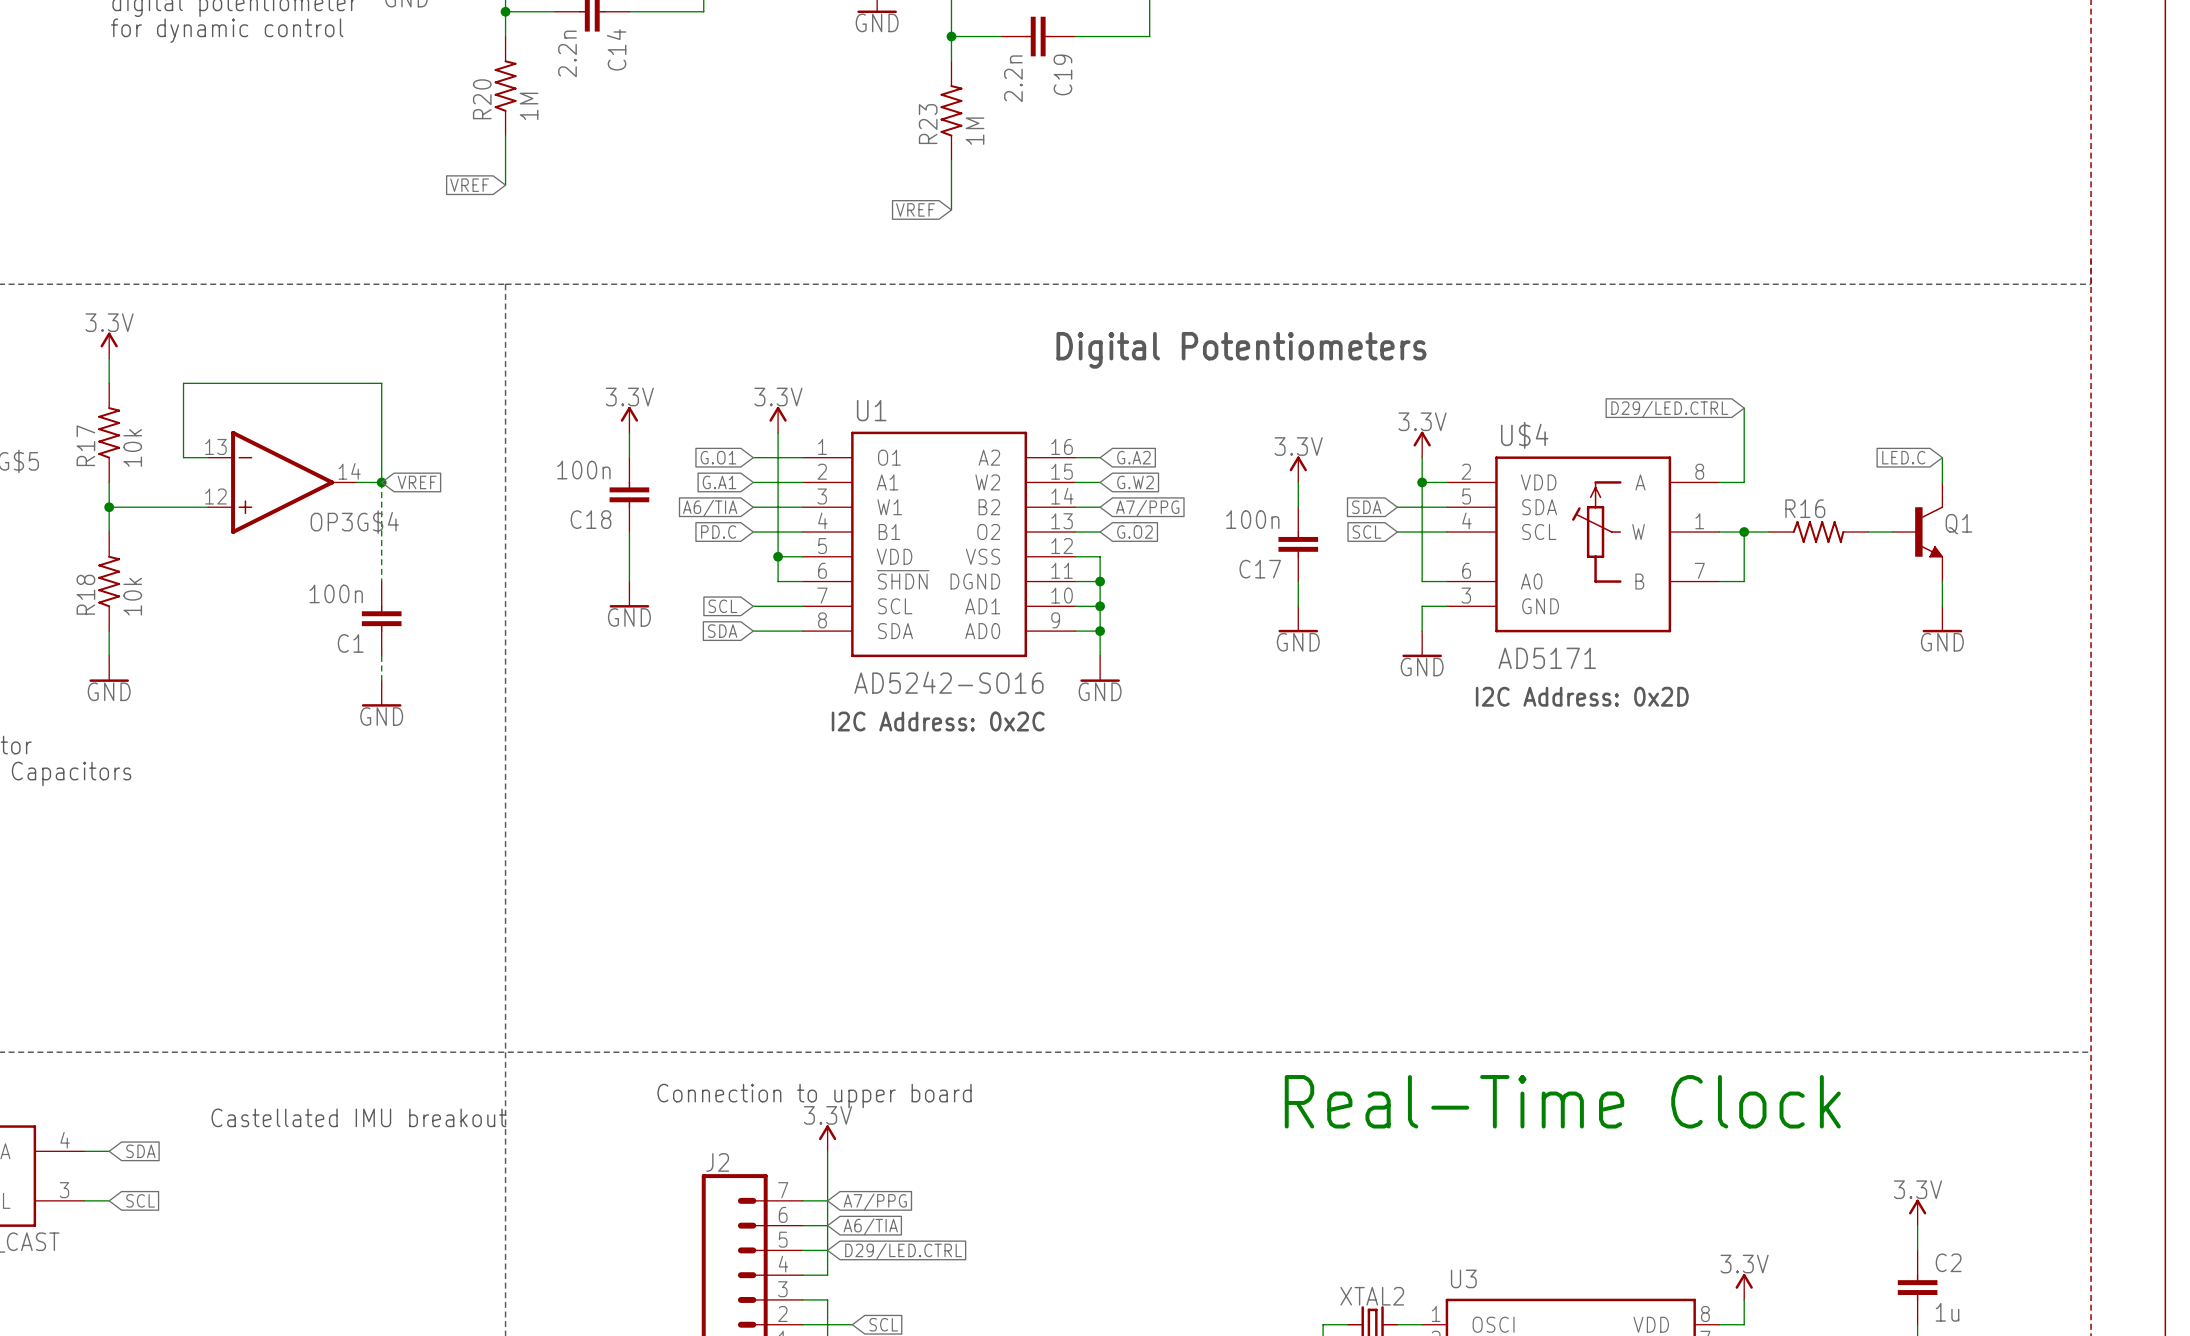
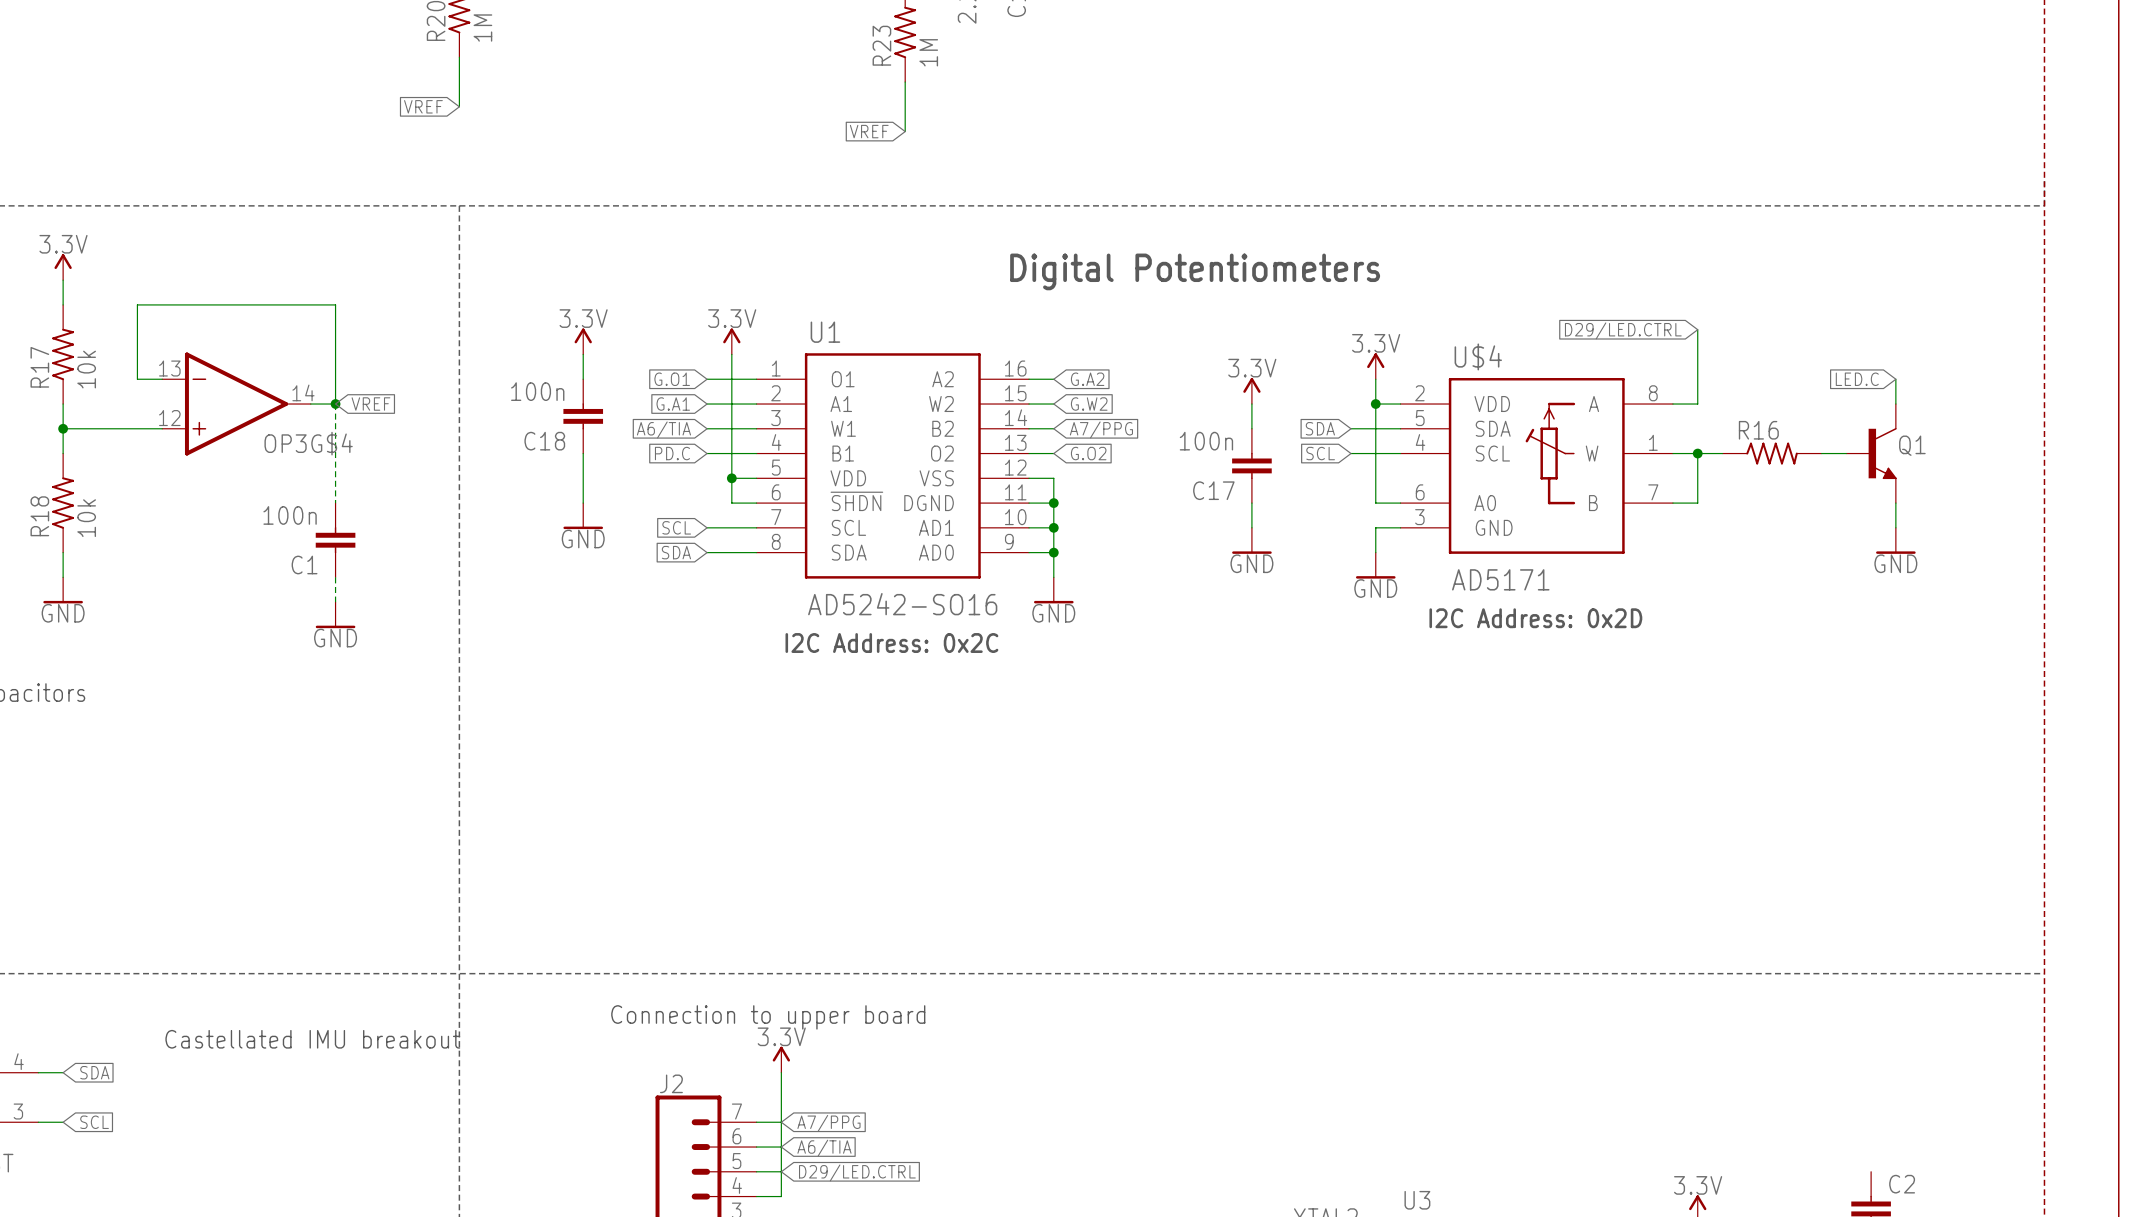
text: Real-Time Clock (1562, 1101) -> none
power symbol: 3.3V (1917, 1212) -> none
wire: (1917, 1225) (1917, 1250) -> none

